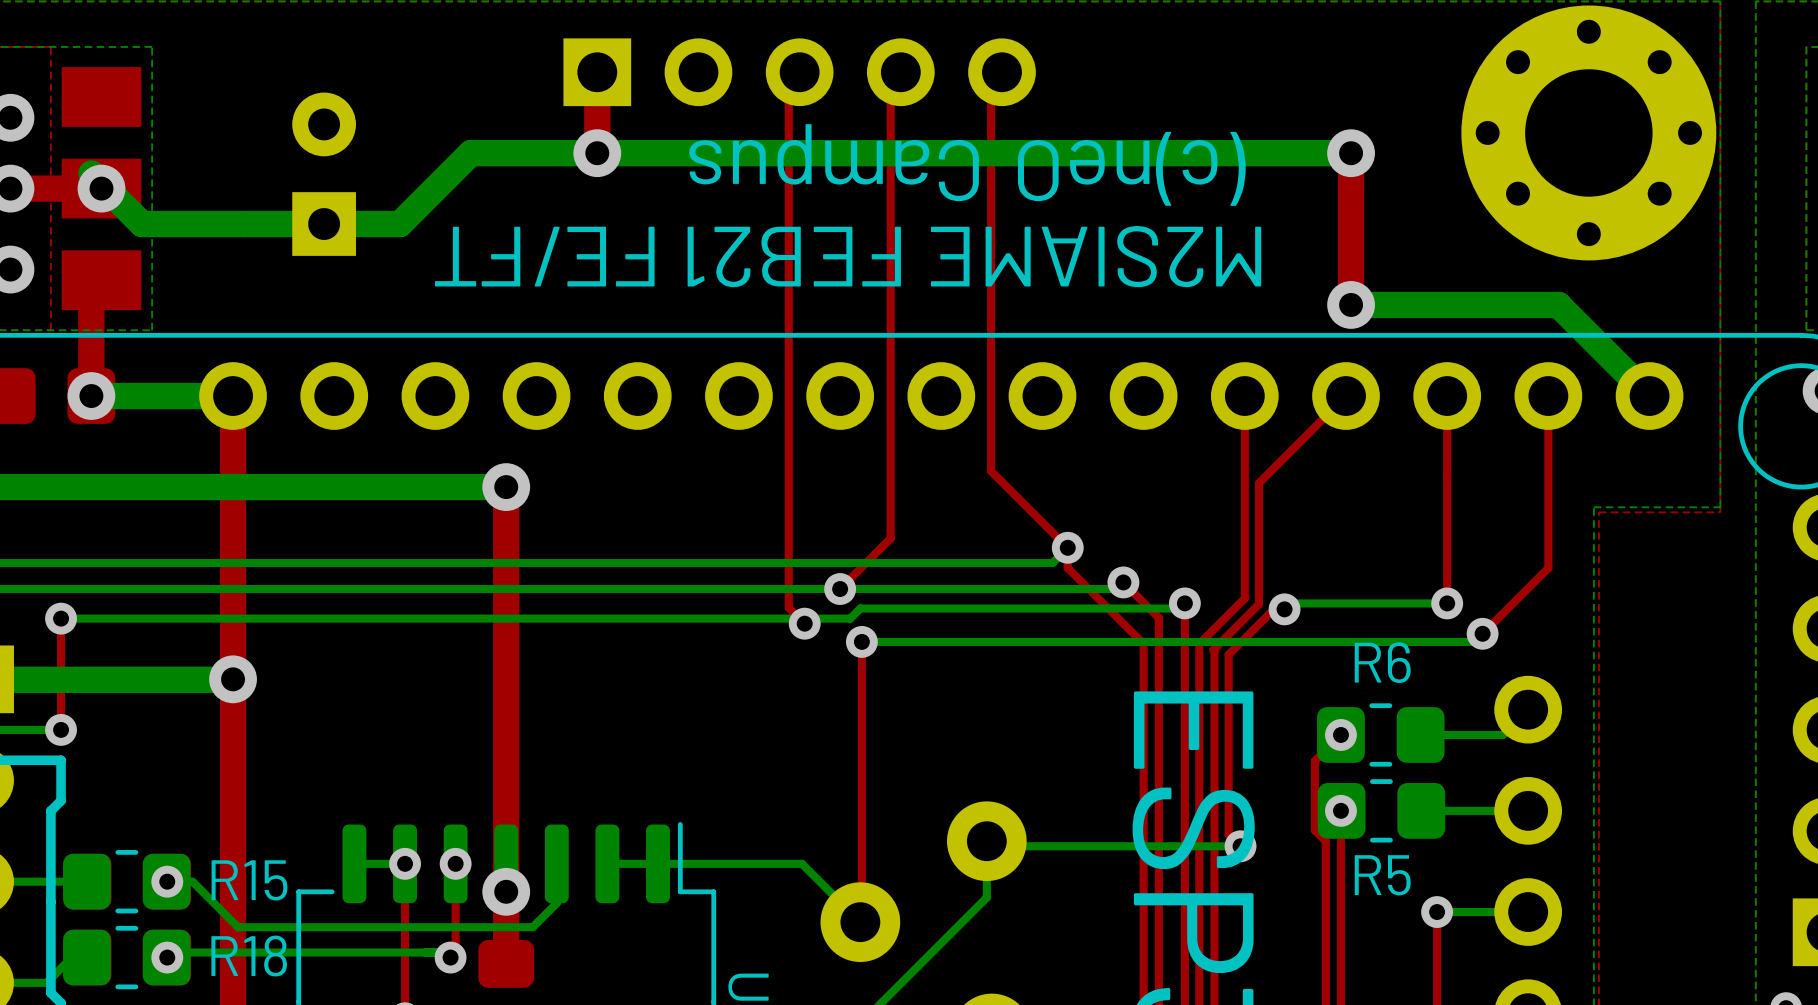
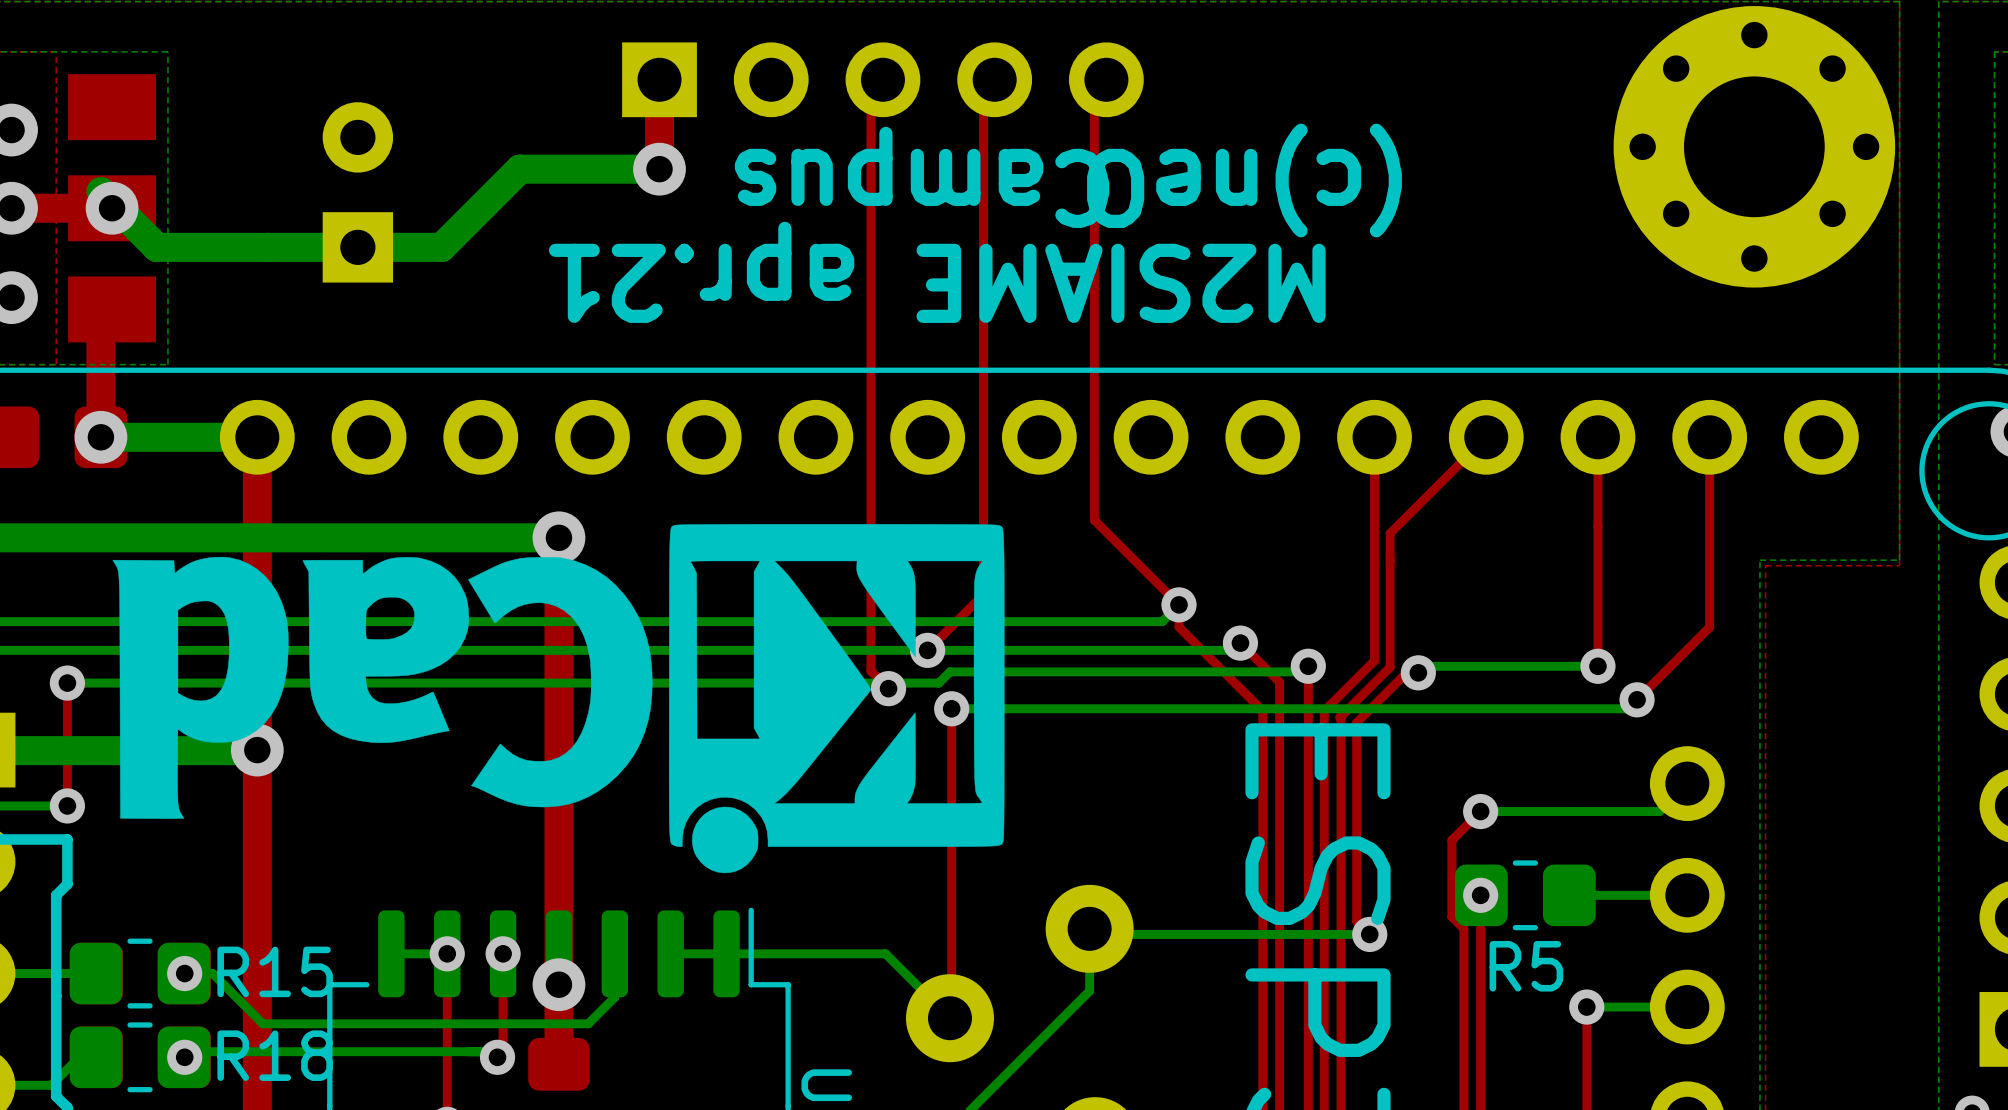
top track: (1351, 153) (1351, 304) -> none
bottom track: (1351, 153) (597, 153) -> none
via: (1351, 153) -> none
text: M2SIAME FEB21 FE/FT (848, 256) -> M2SIAME apr.21 (937, 272)
bottom track: (1351, 304) (1558, 304) (1649, 396) -> none
via: (1351, 304) -> none
drawing: none -> [112, 524, 1005, 874]
R6: (1380, 734) -> none
bottom track: none -> (1568, 811) (1480, 811)

